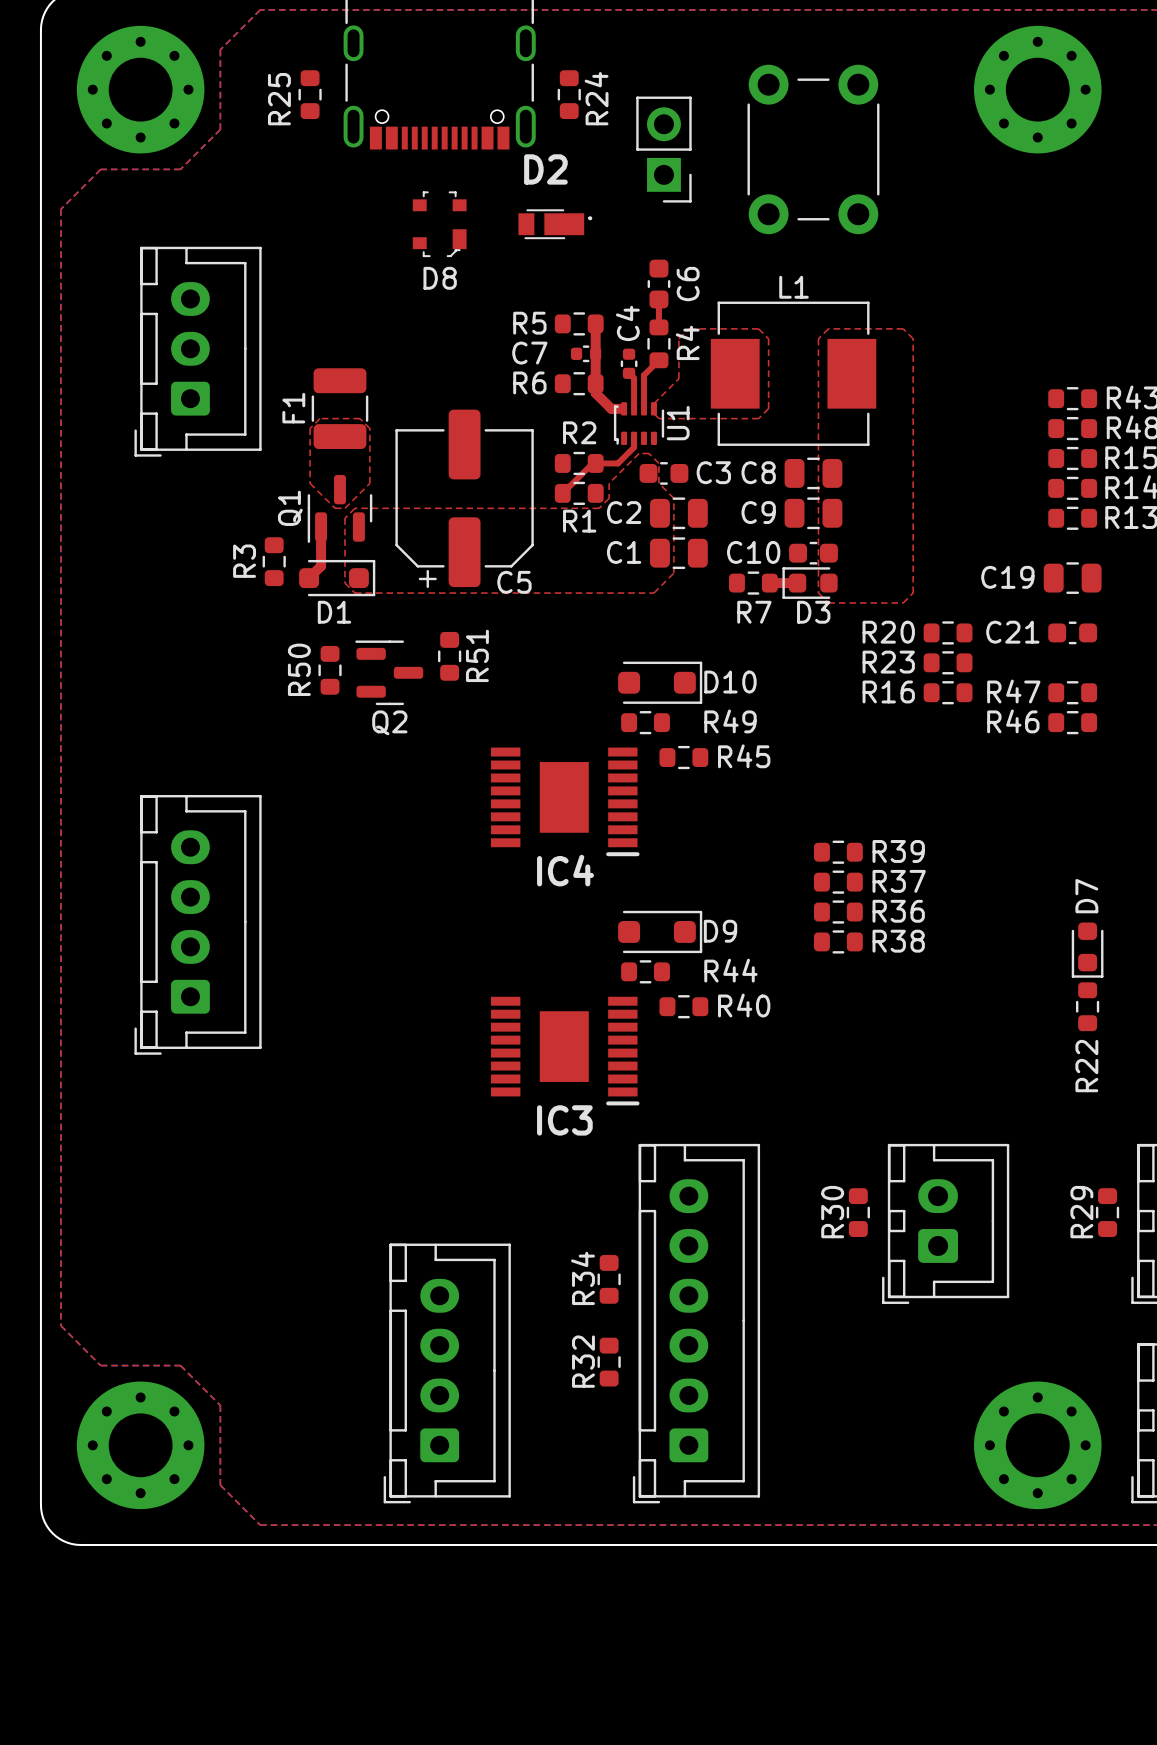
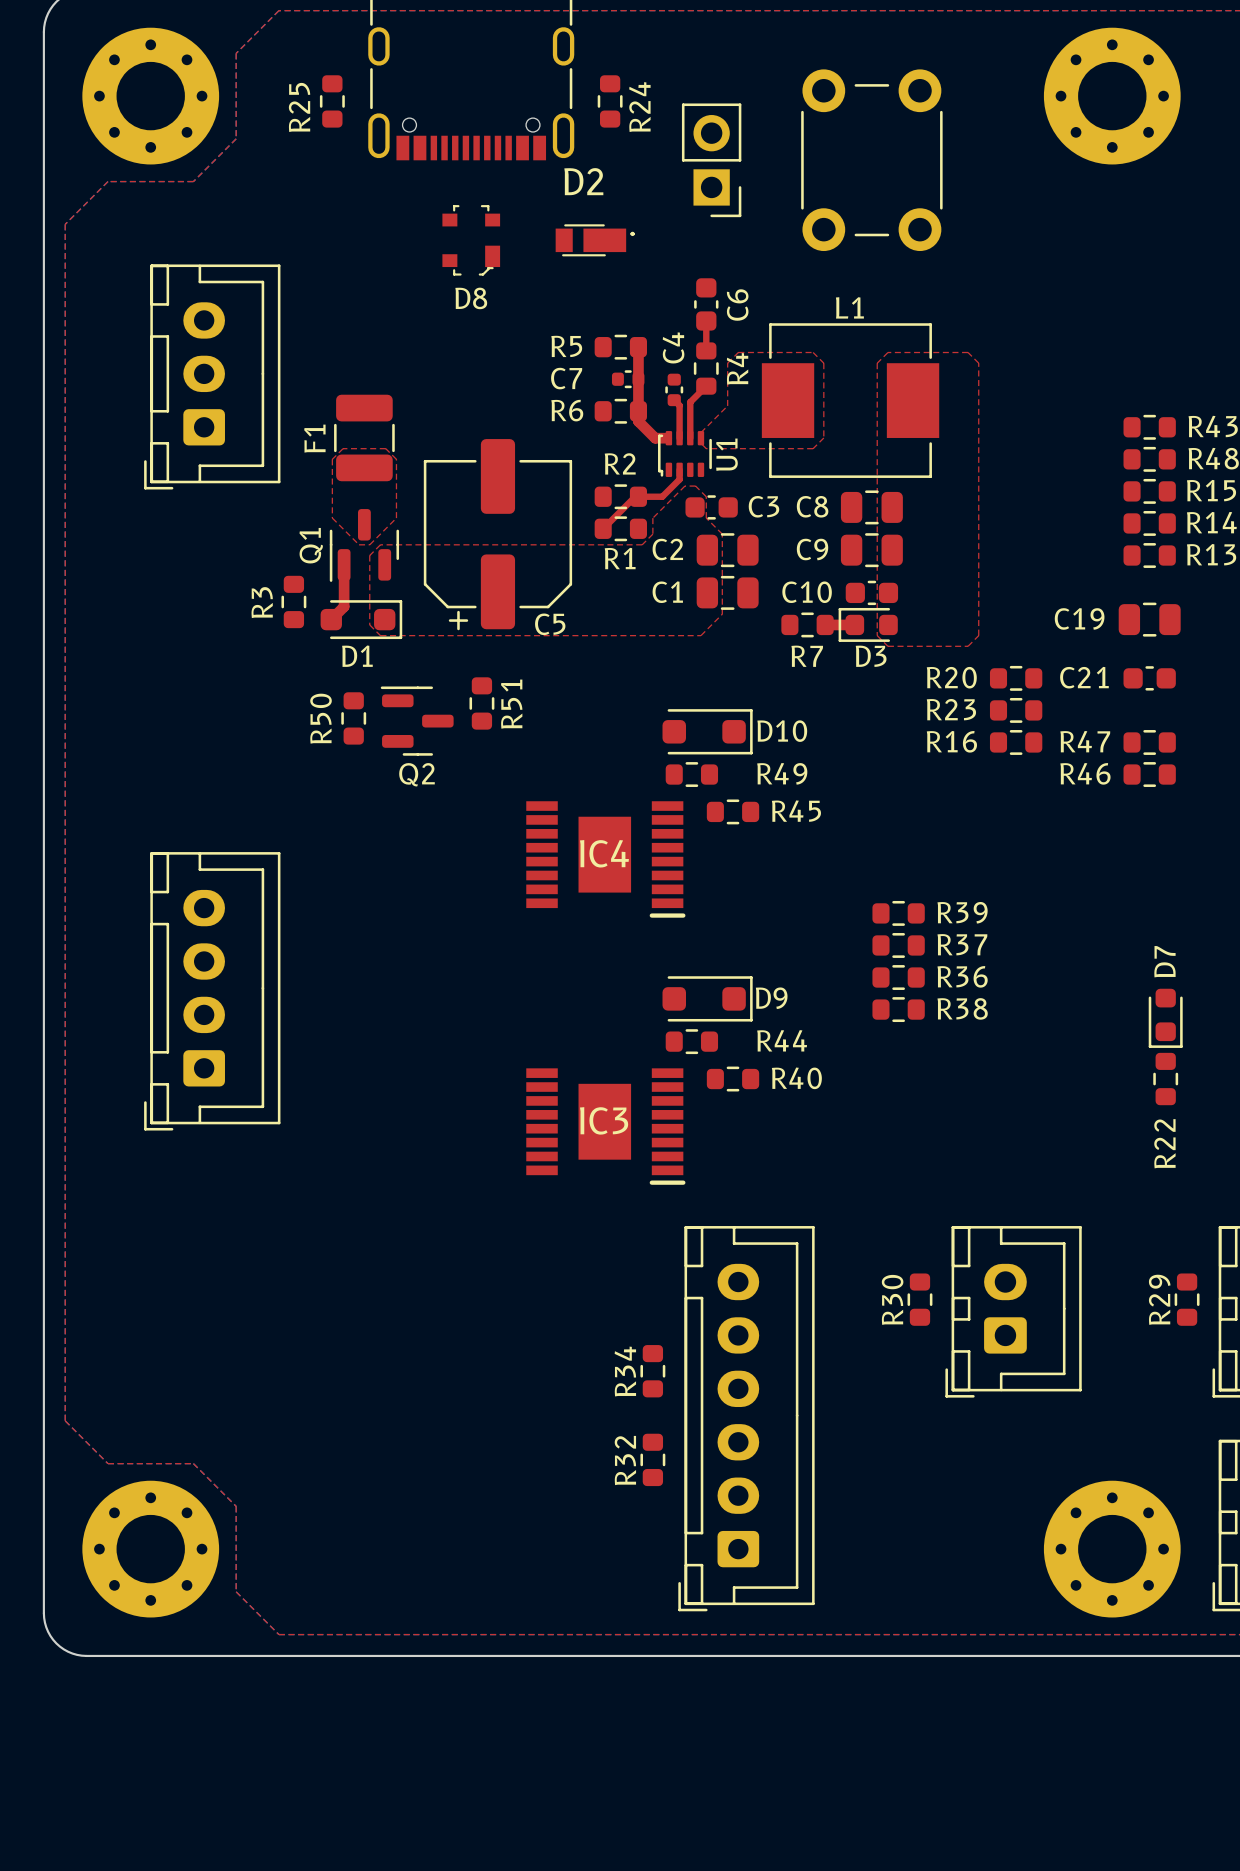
IC4 name position: IC4 (565, 870) -> IC4 (604, 853)
IC3 name position: IC3 (564, 1120) -> IC3 (604, 1120)
part: (447, 1373) -> none

